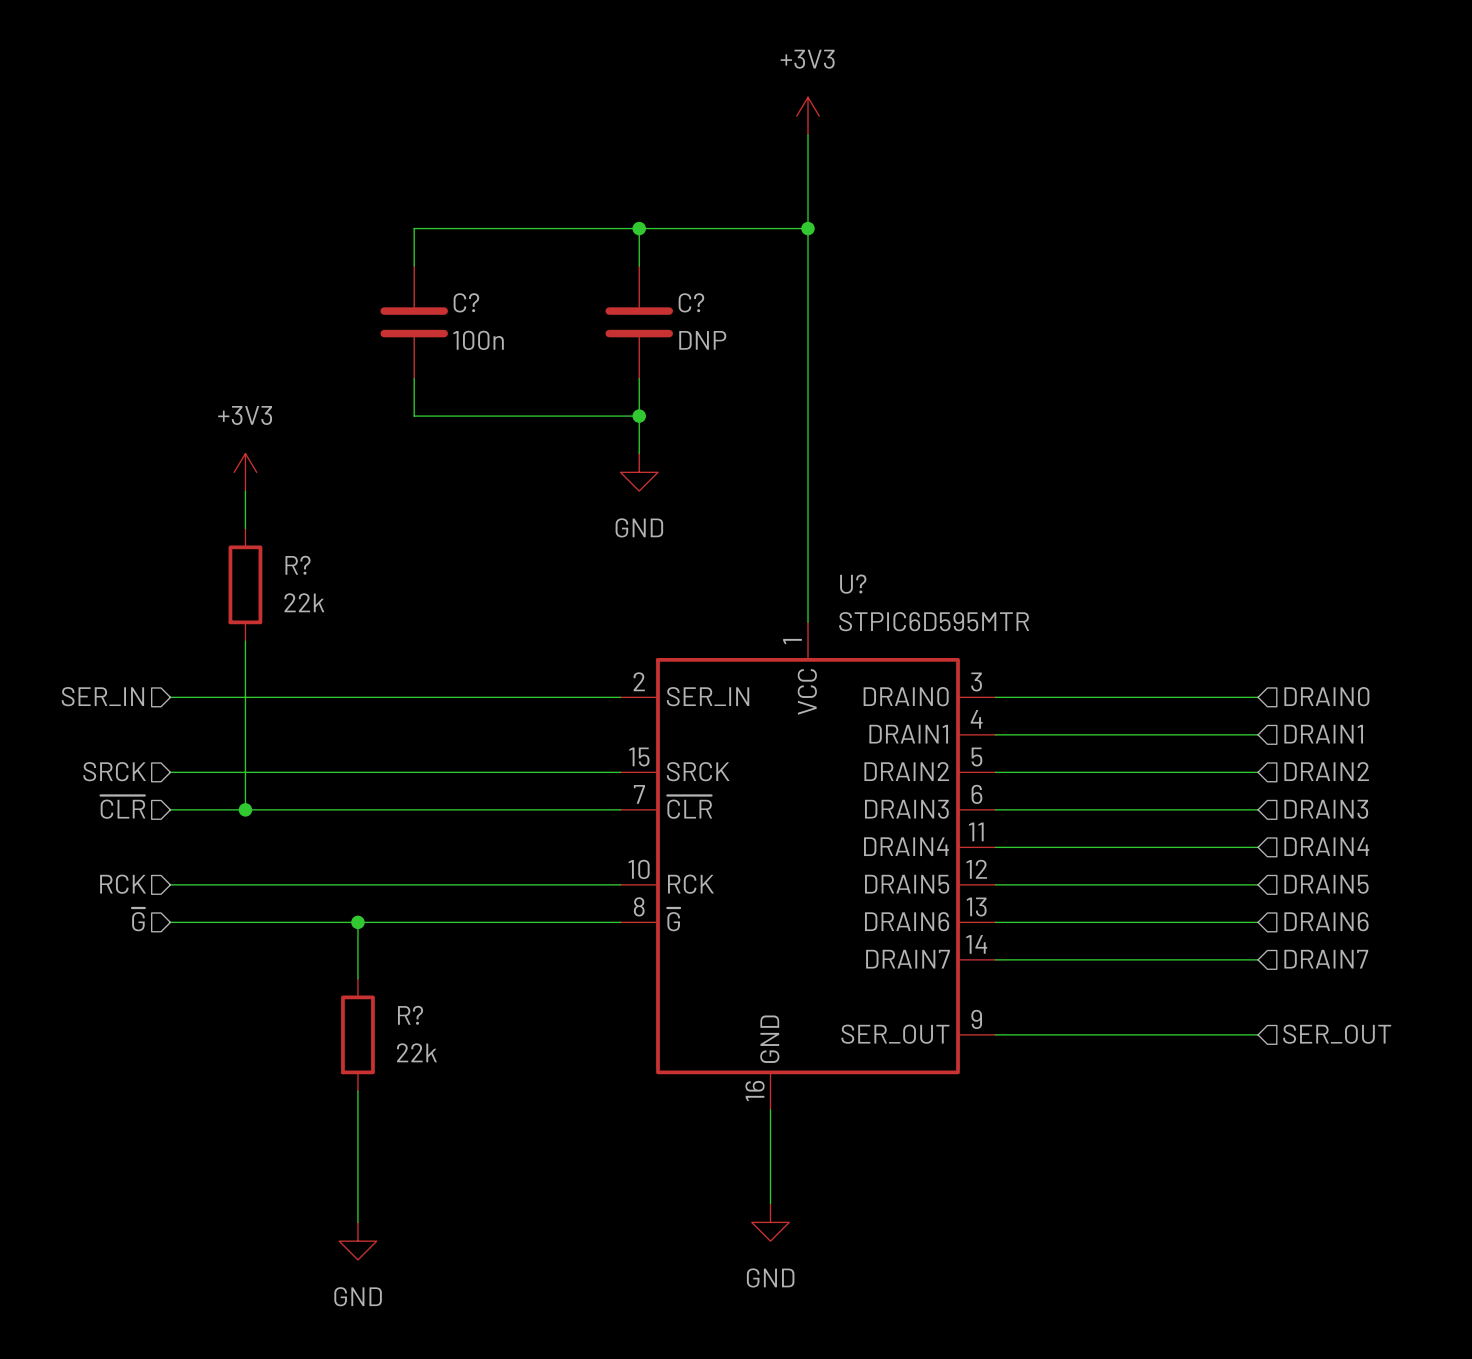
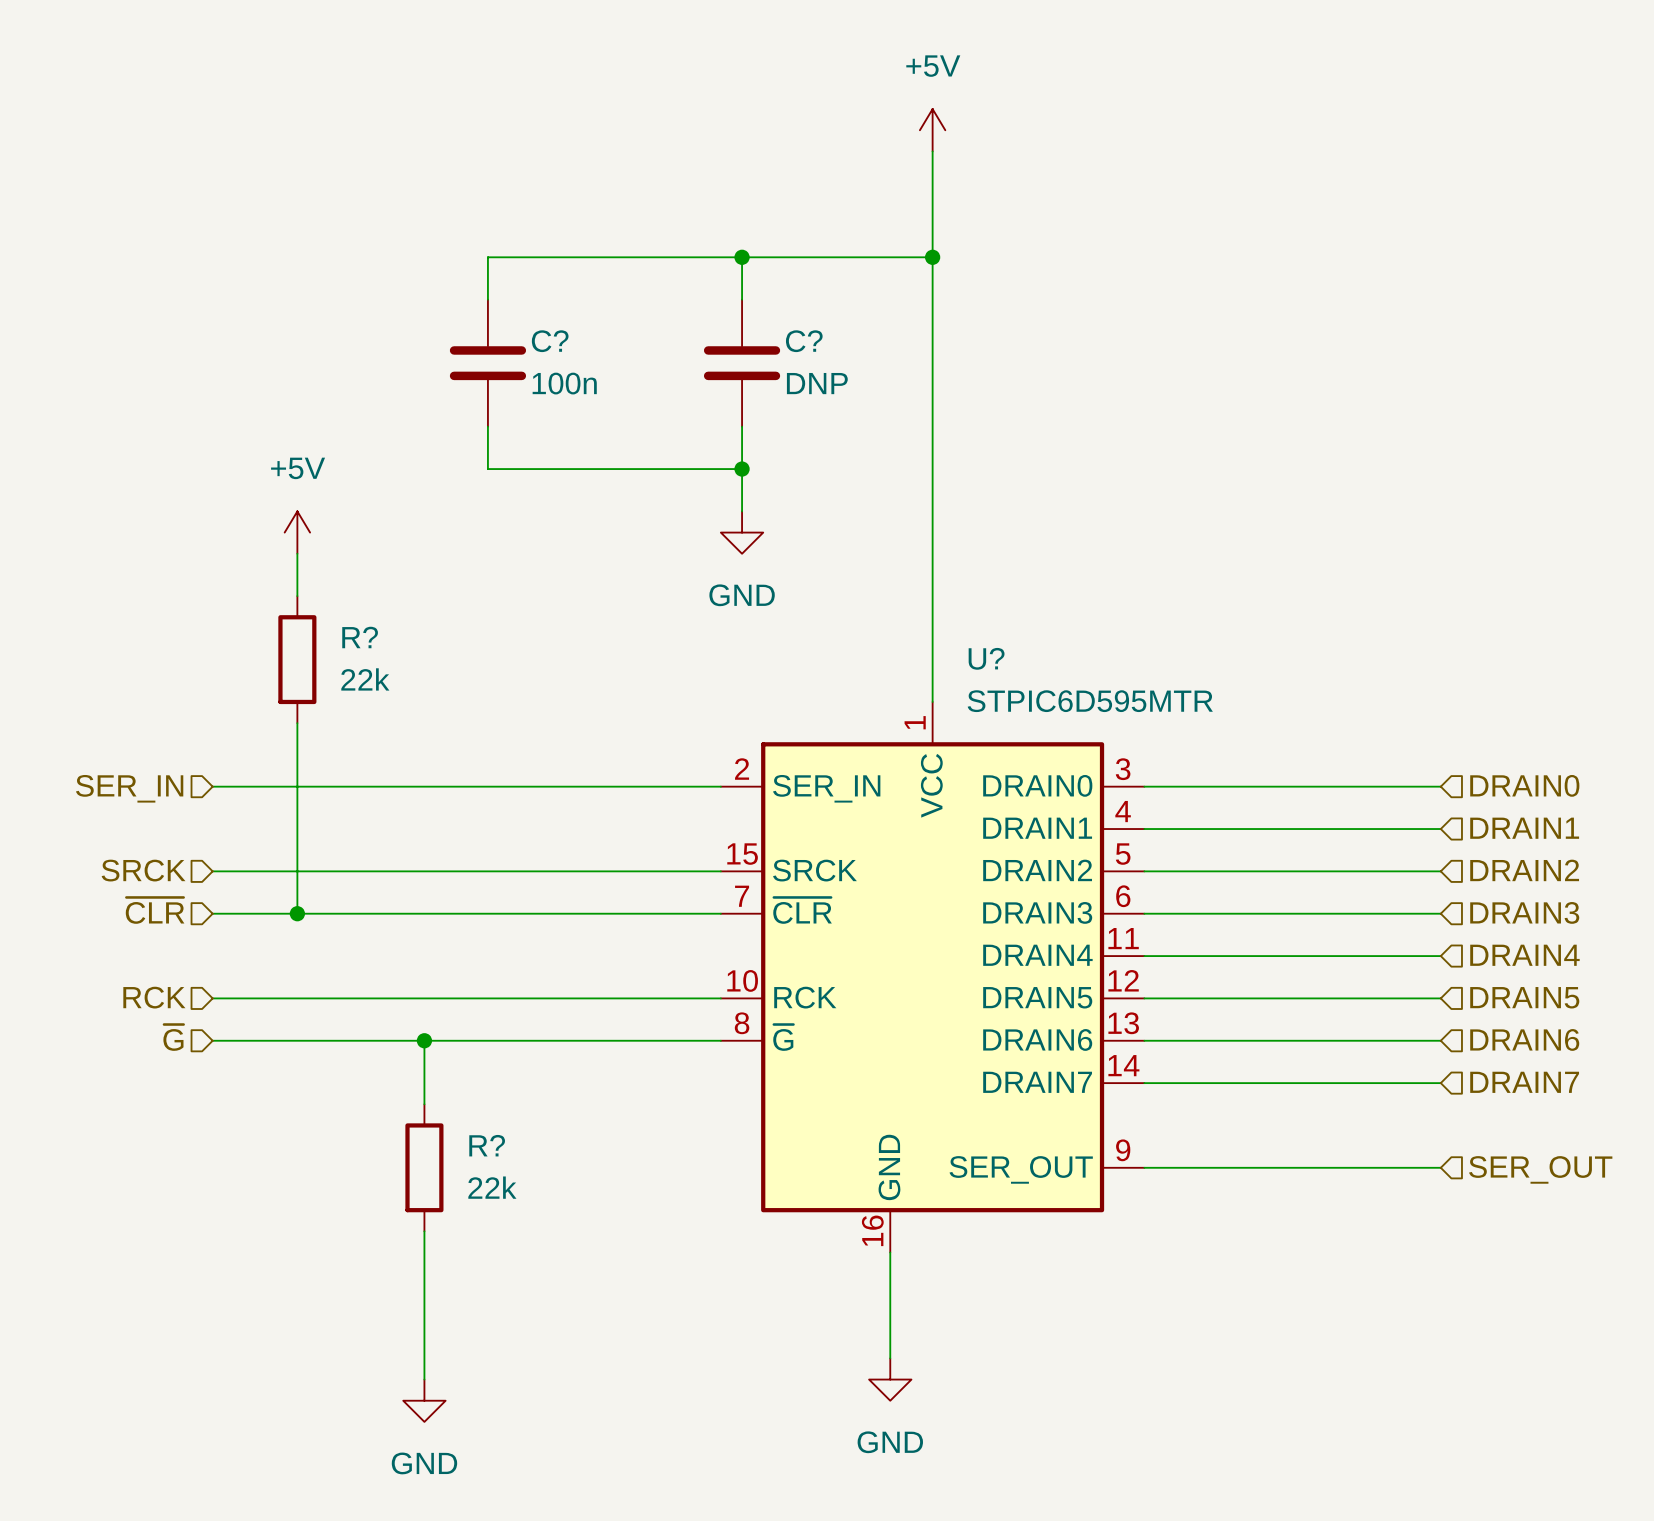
power symbol: +3V3 (808, 116) -> +5V (932, 130)
power symbol: +3V3 (245, 472) -> +5V (297, 532)

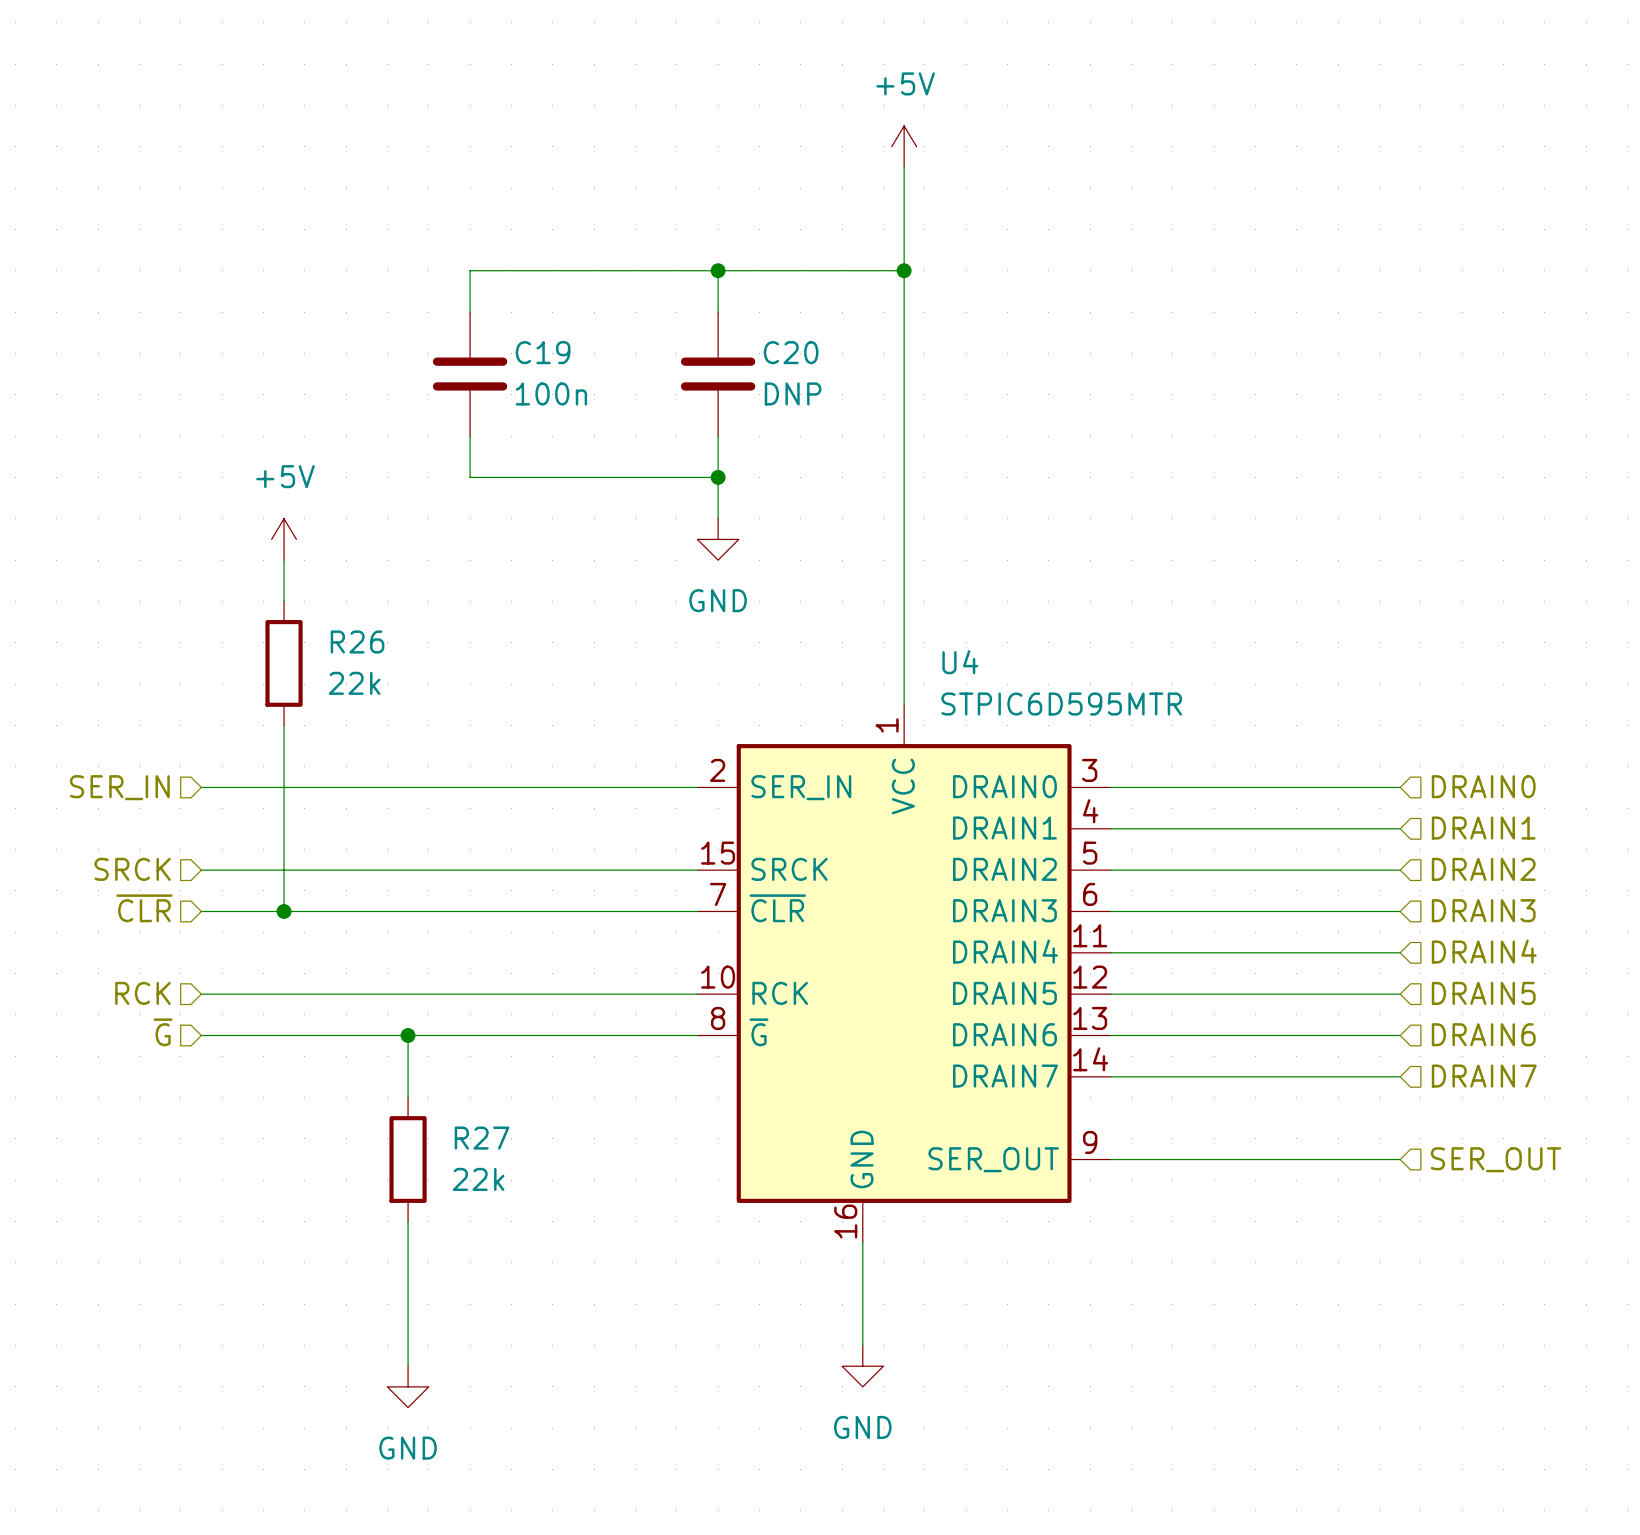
C? name: C? (550, 341) -> C19 (543, 352)
C? name: C? (804, 341) -> C20 (791, 352)
R? name: R? (360, 637) -> R26 (357, 641)
U? name: U? (986, 658) -> U4 (960, 662)
R? name: R? (487, 1145) -> R27 (482, 1138)

